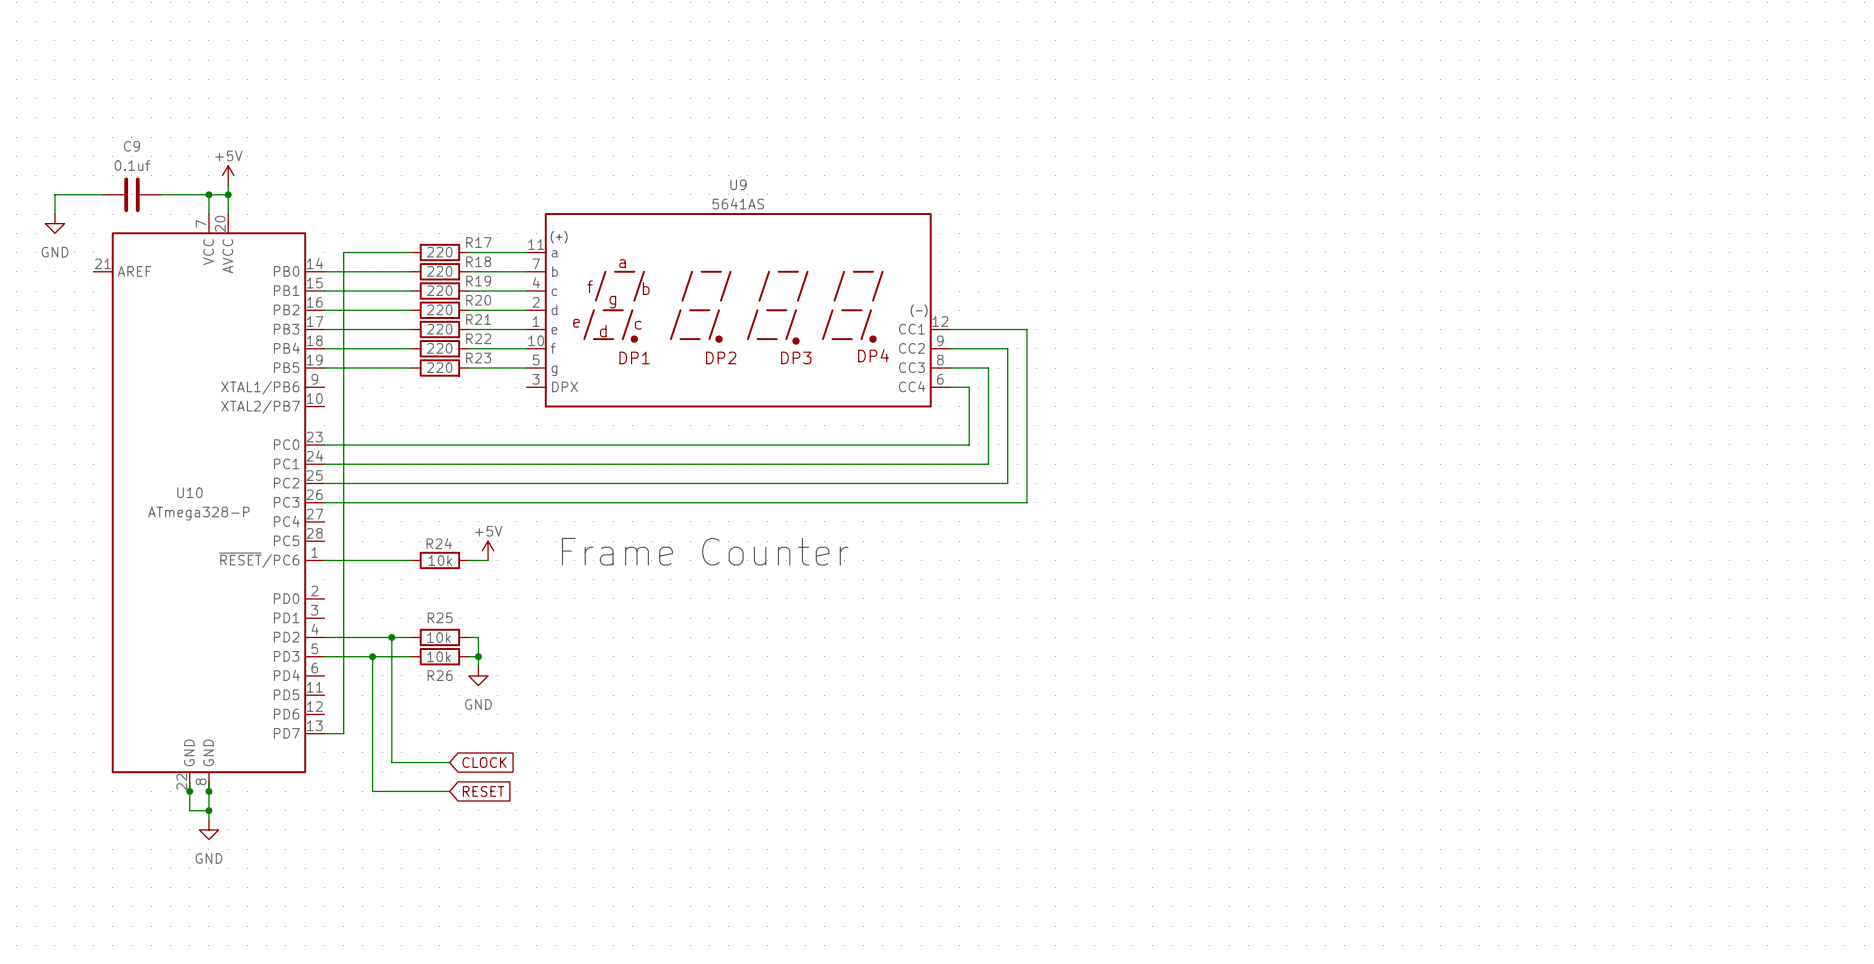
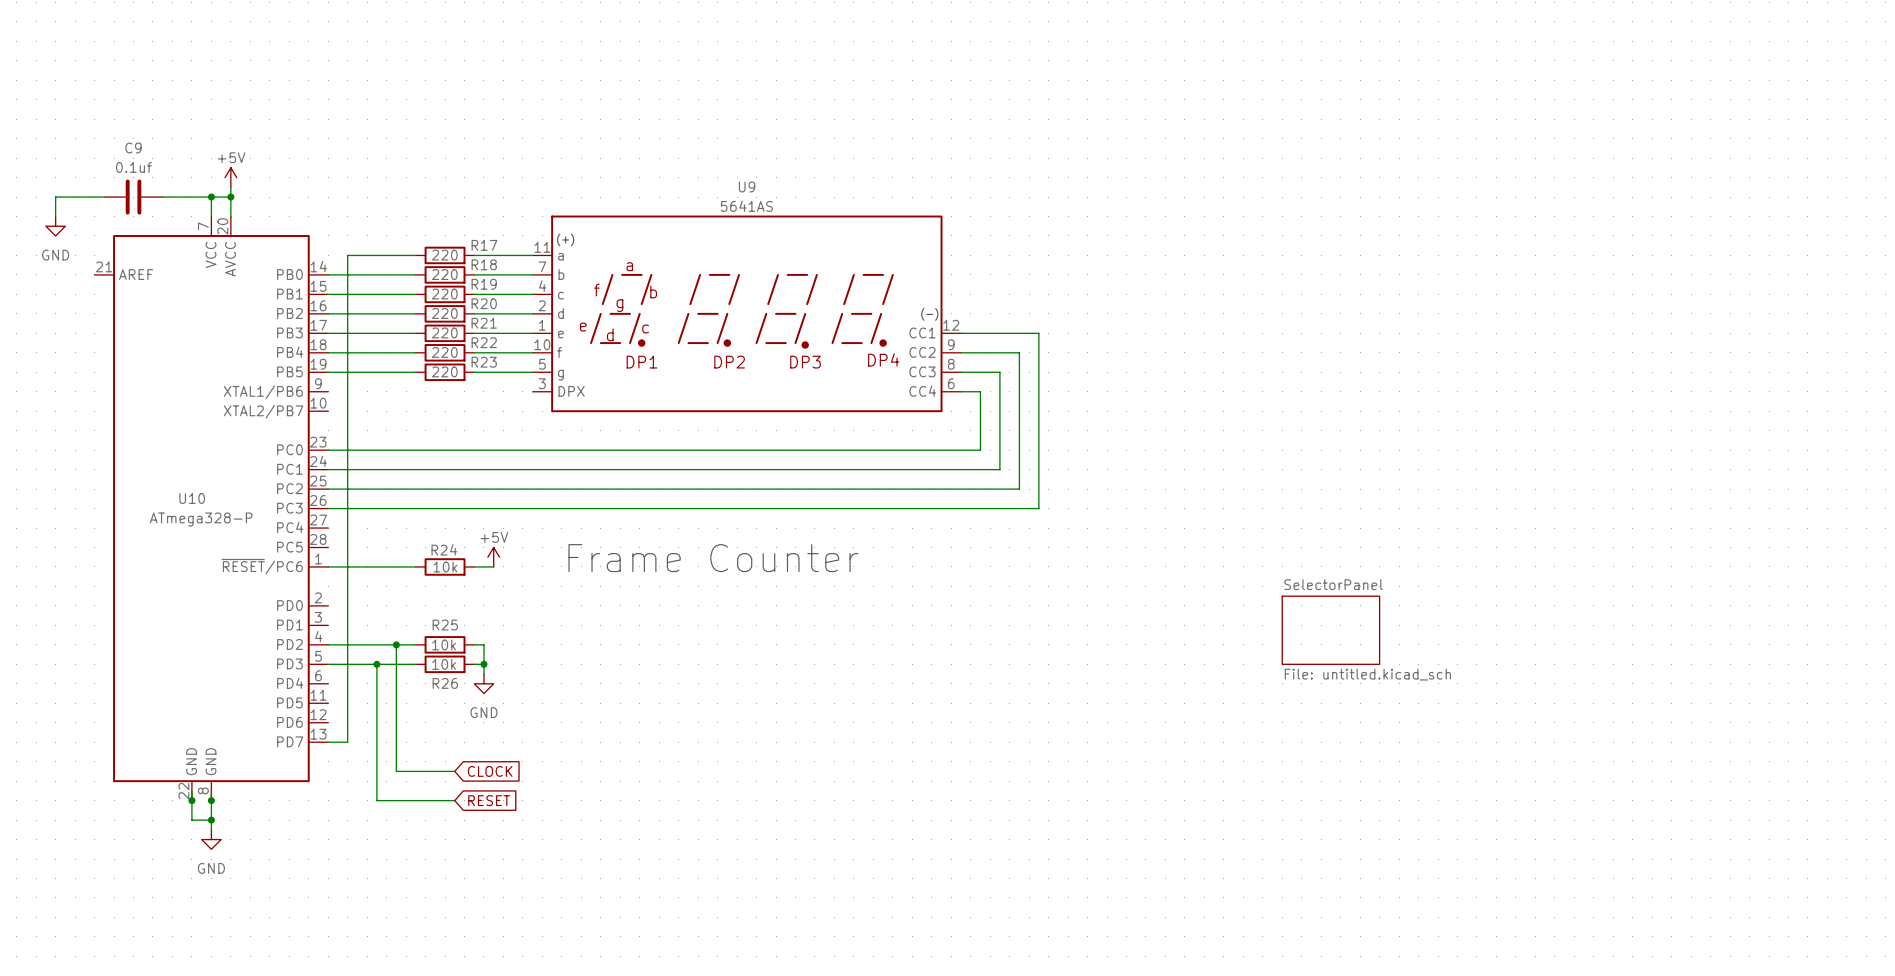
sheet SelectorPanel: none -> File: untitled.kicad_sch (1330, 630)

